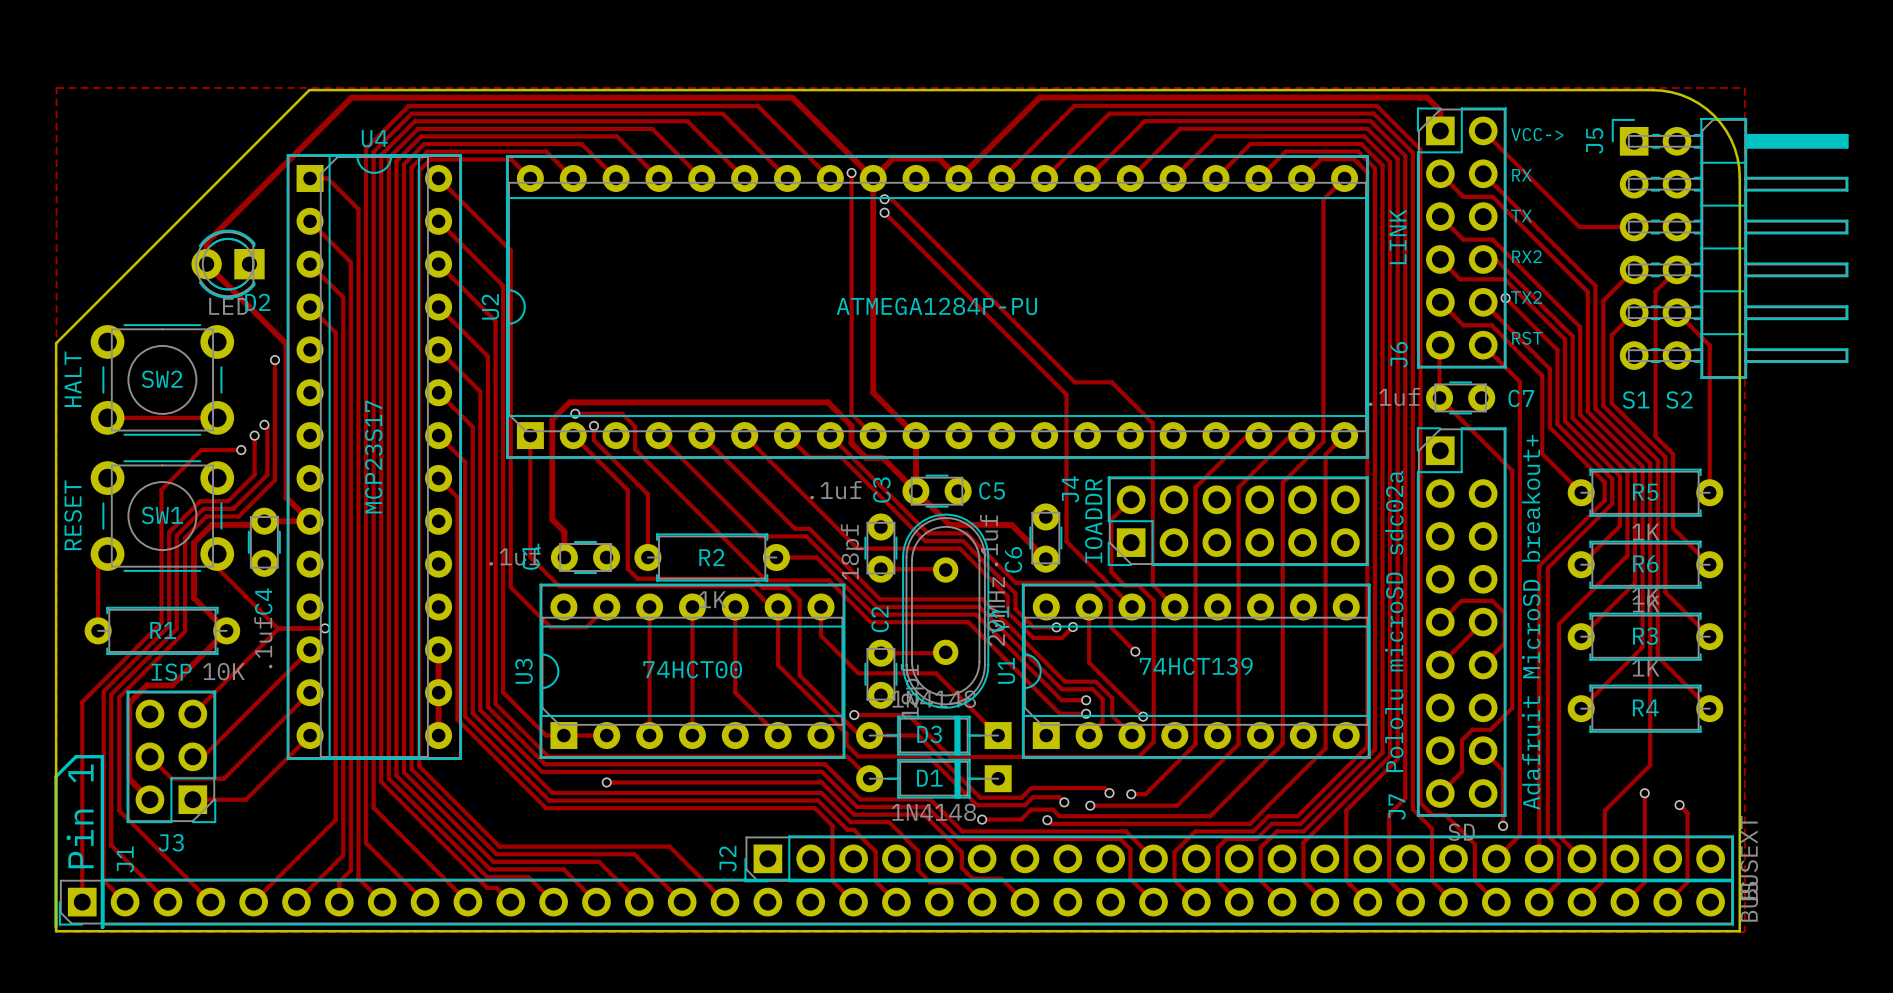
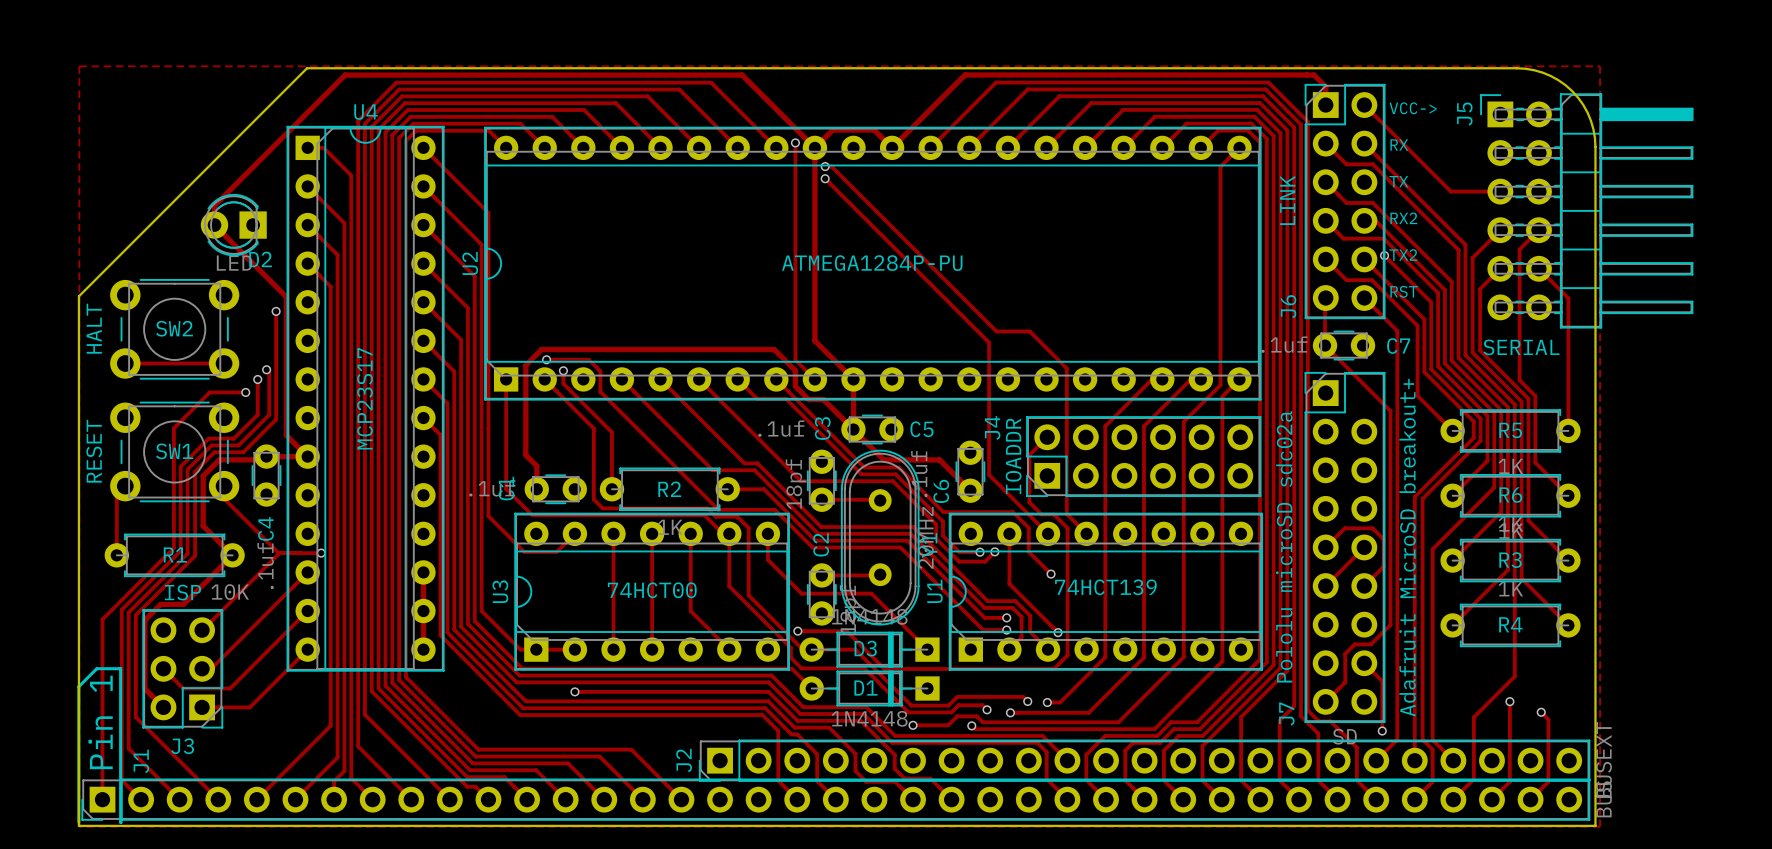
J5 value: S1 S2 (1657, 399) -> SERIAL (1521, 347)

